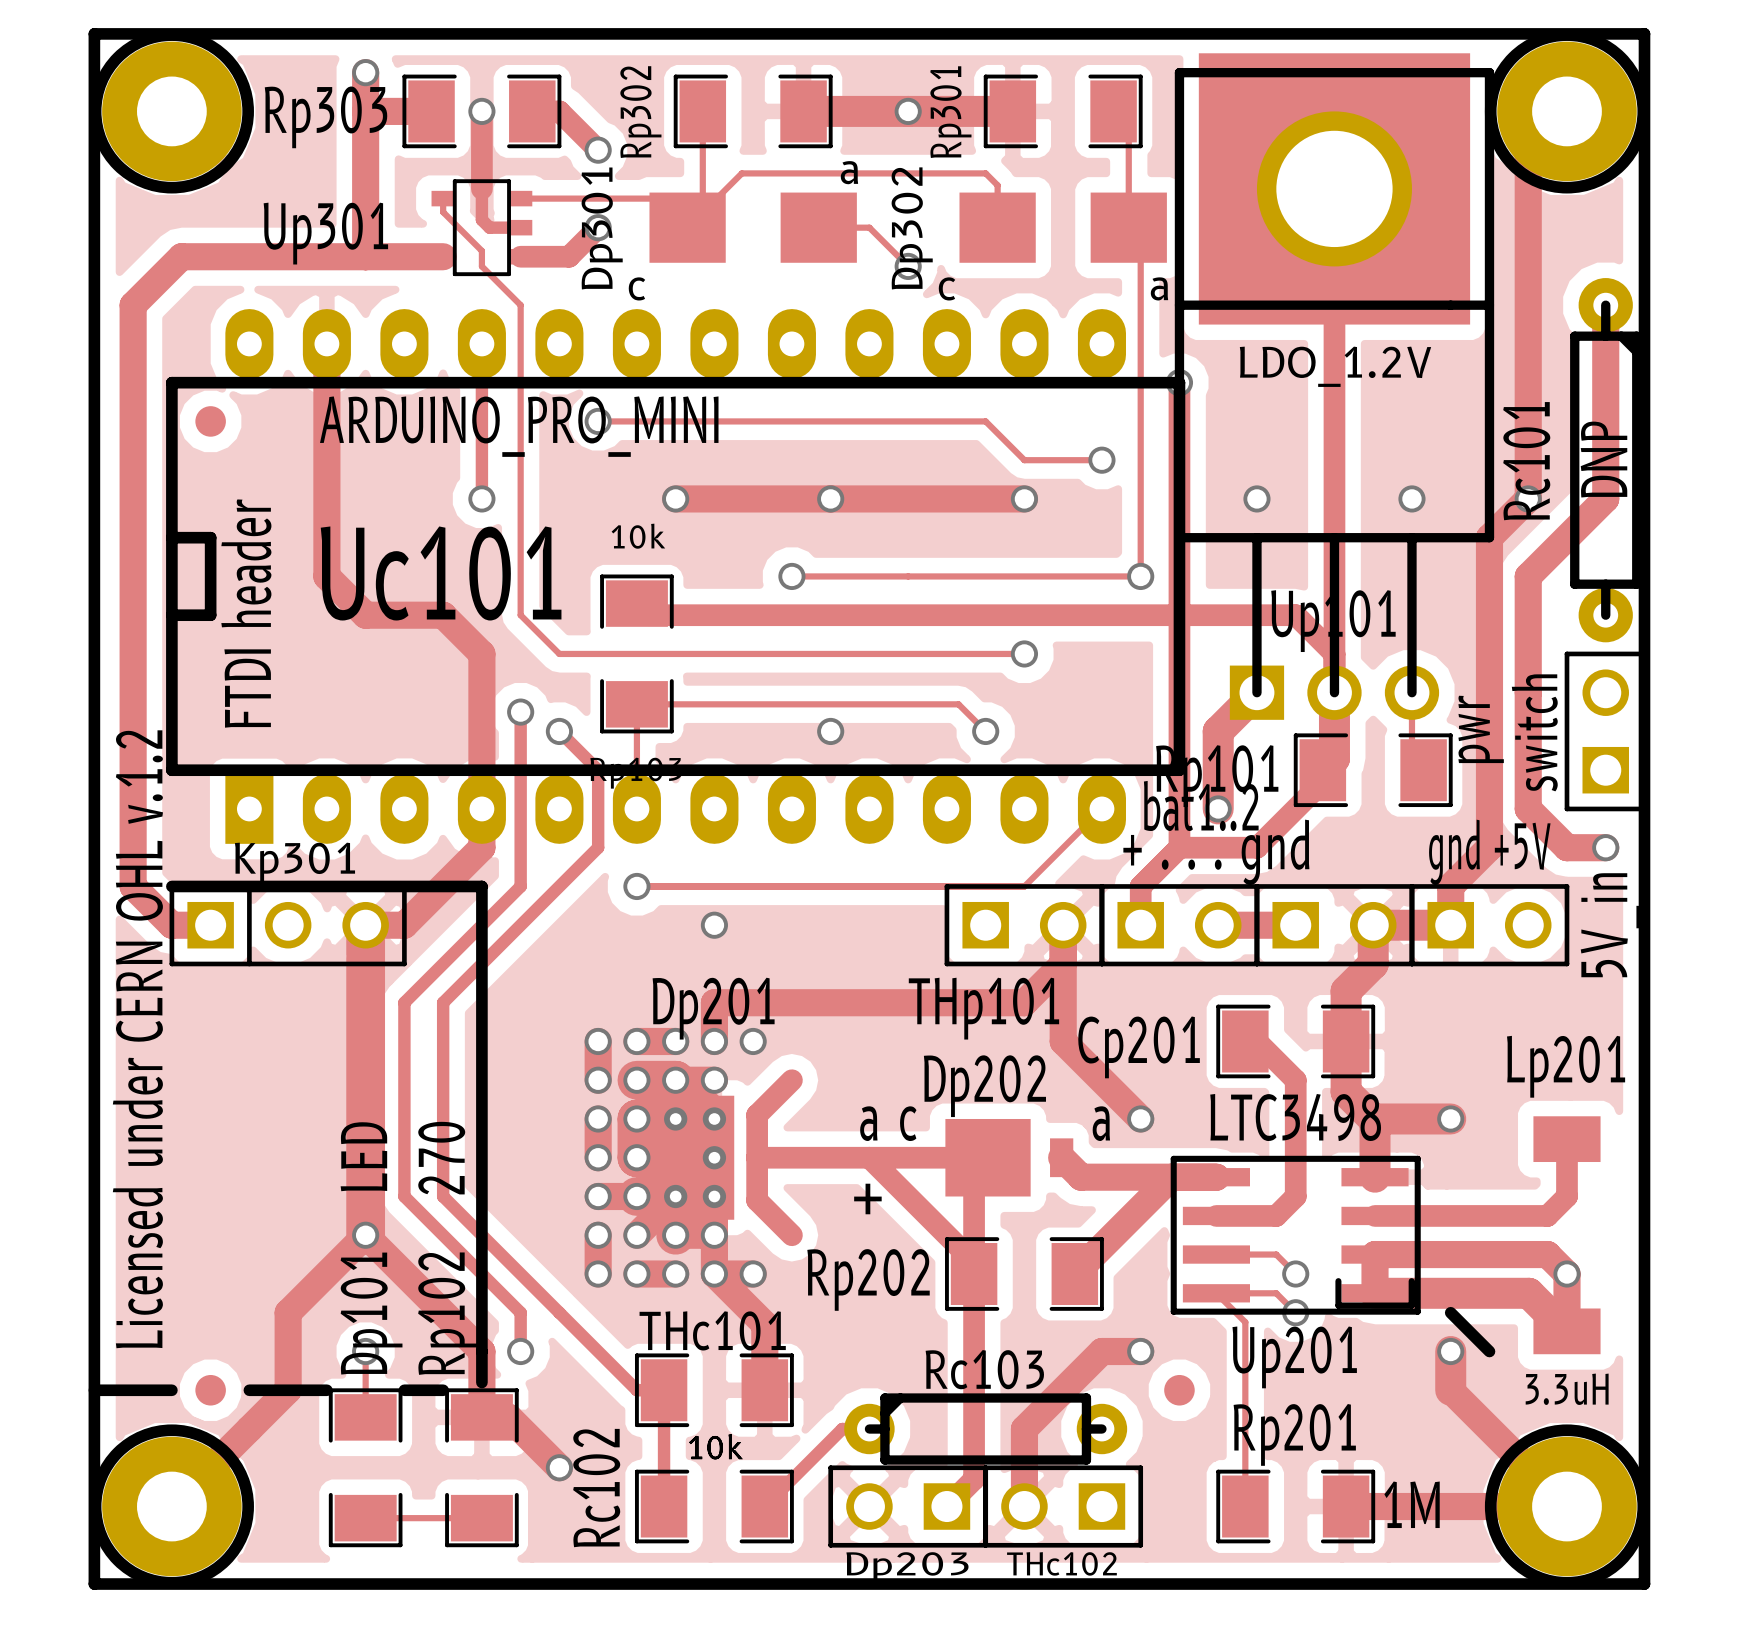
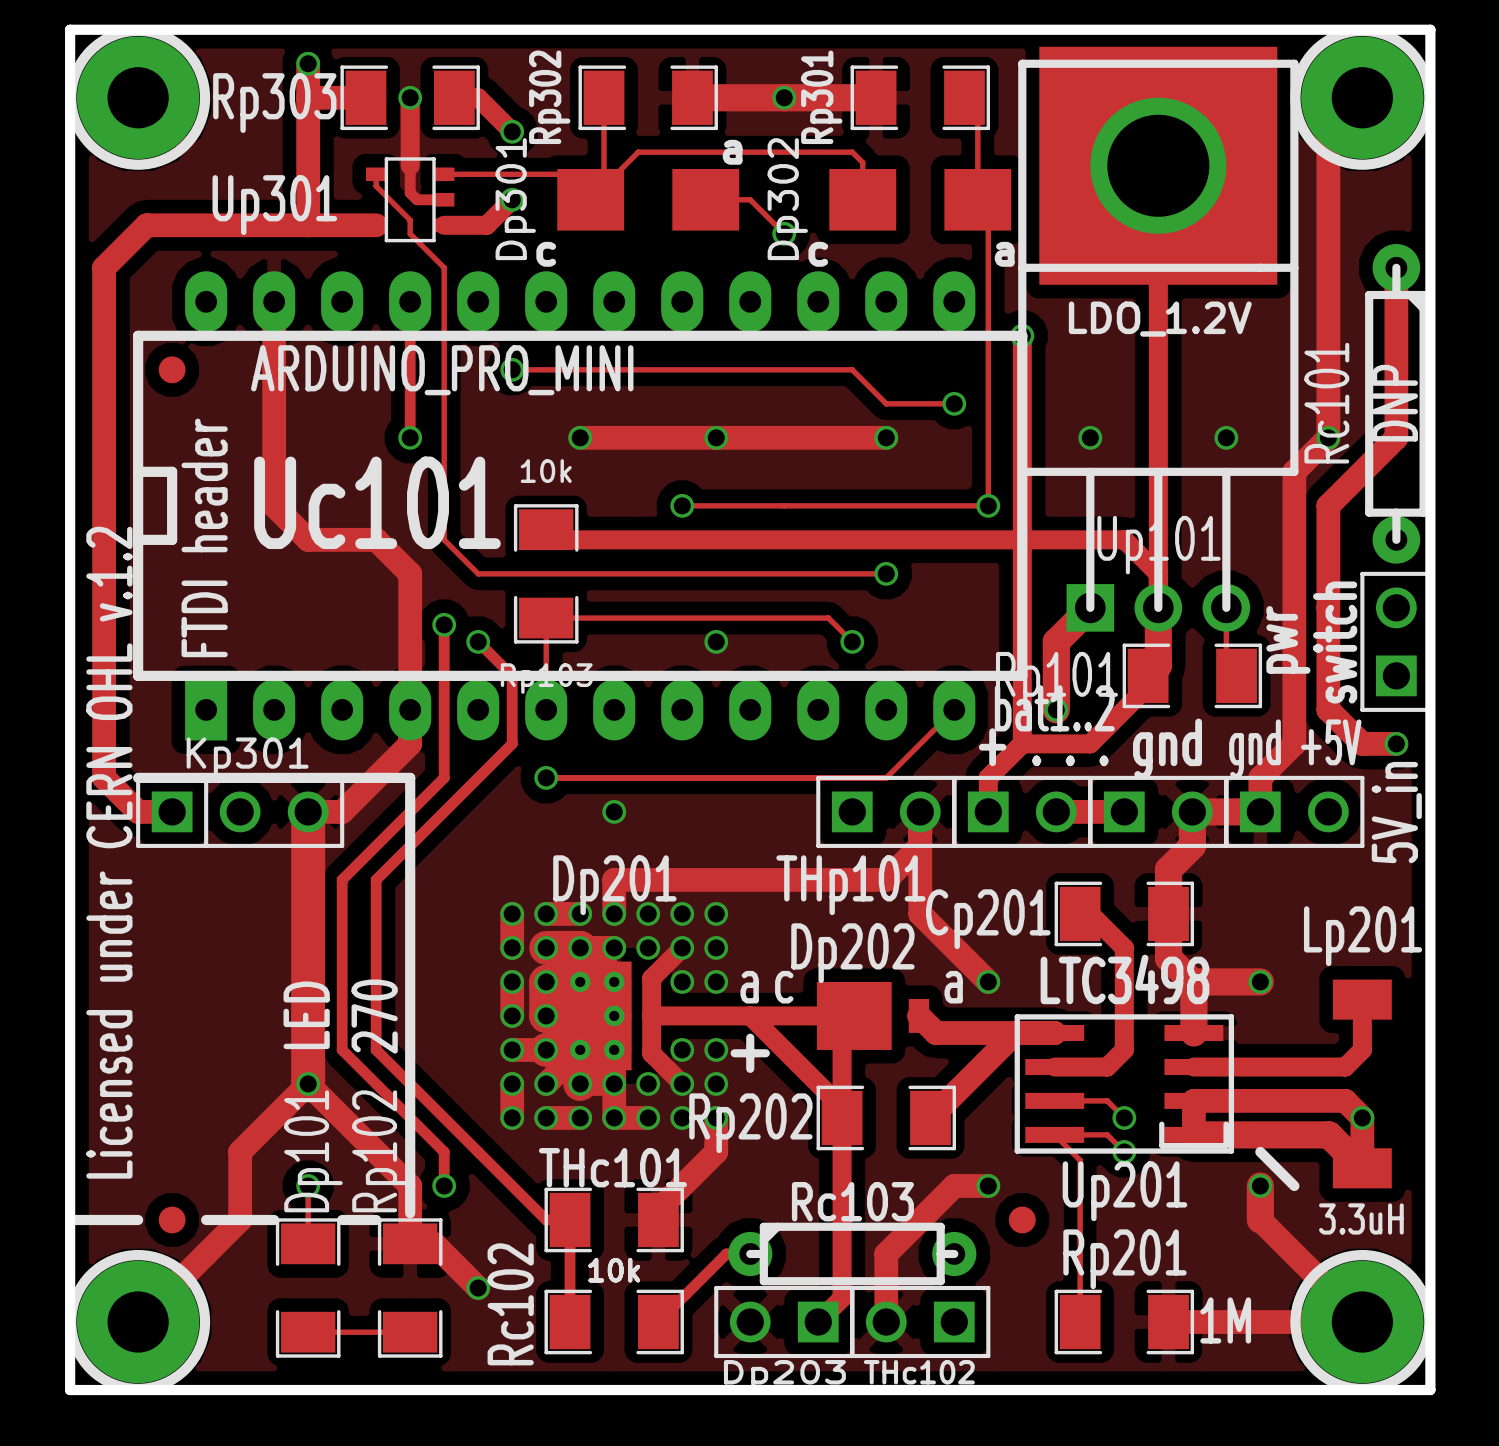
via: none -> (682, 913)
via: none -> (716, 913)
via: none -> (648, 947)
via: none -> (682, 947)
via: none -> (716, 947)
via: none -> (682, 981)
via: none -> (716, 981)
via: none -> (682, 1049)
via: none -> (716, 1049)
via: none -> (648, 1083)
via: none -> (682, 1083)
via: none -> (716, 1083)
track: (714, 1274) (764, 1324) (764, 1378) -> (716, 1117) (716, 1151) (658, 1209)
via: none -> (682, 1117)
via: none -> (716, 1117)

